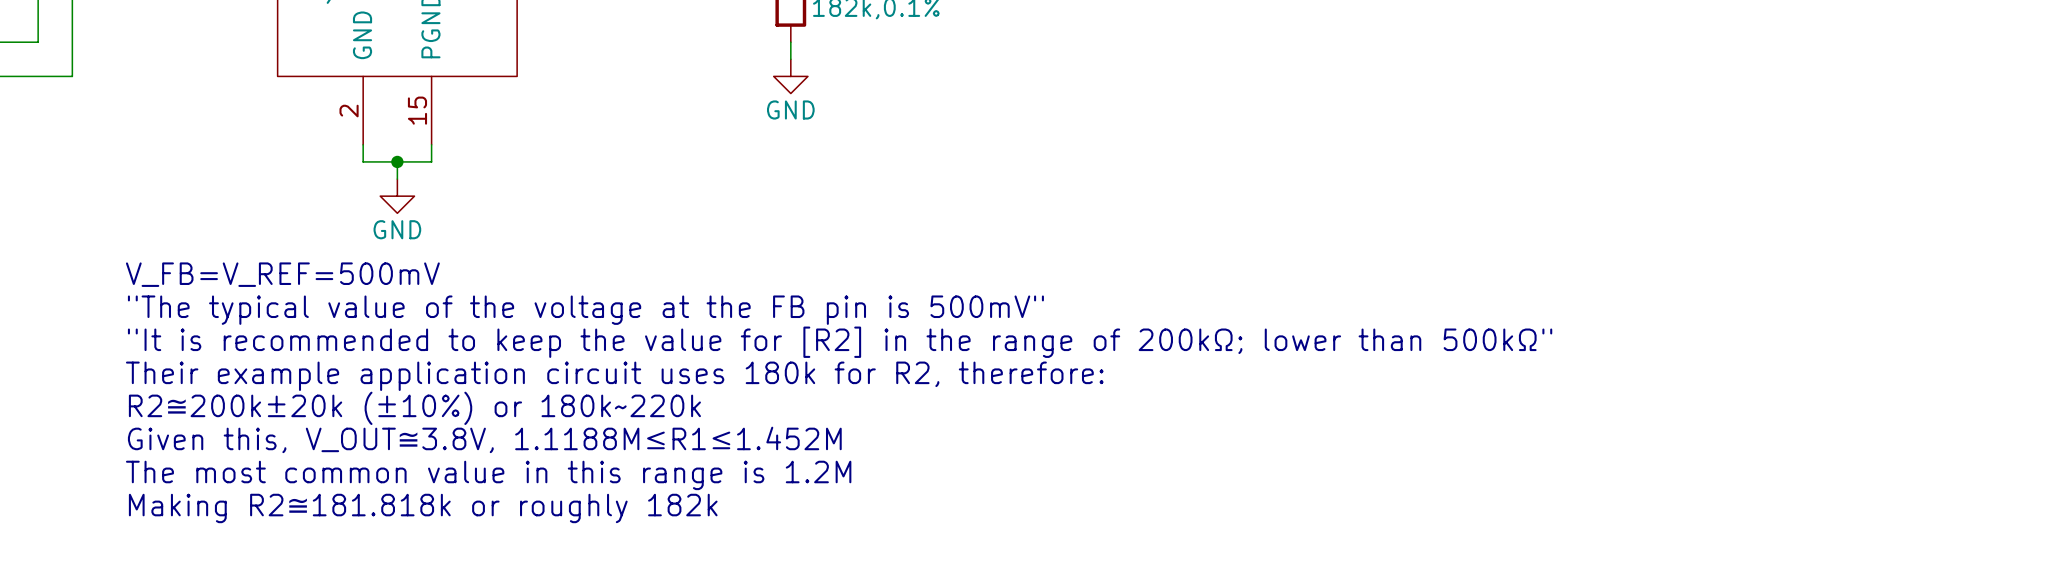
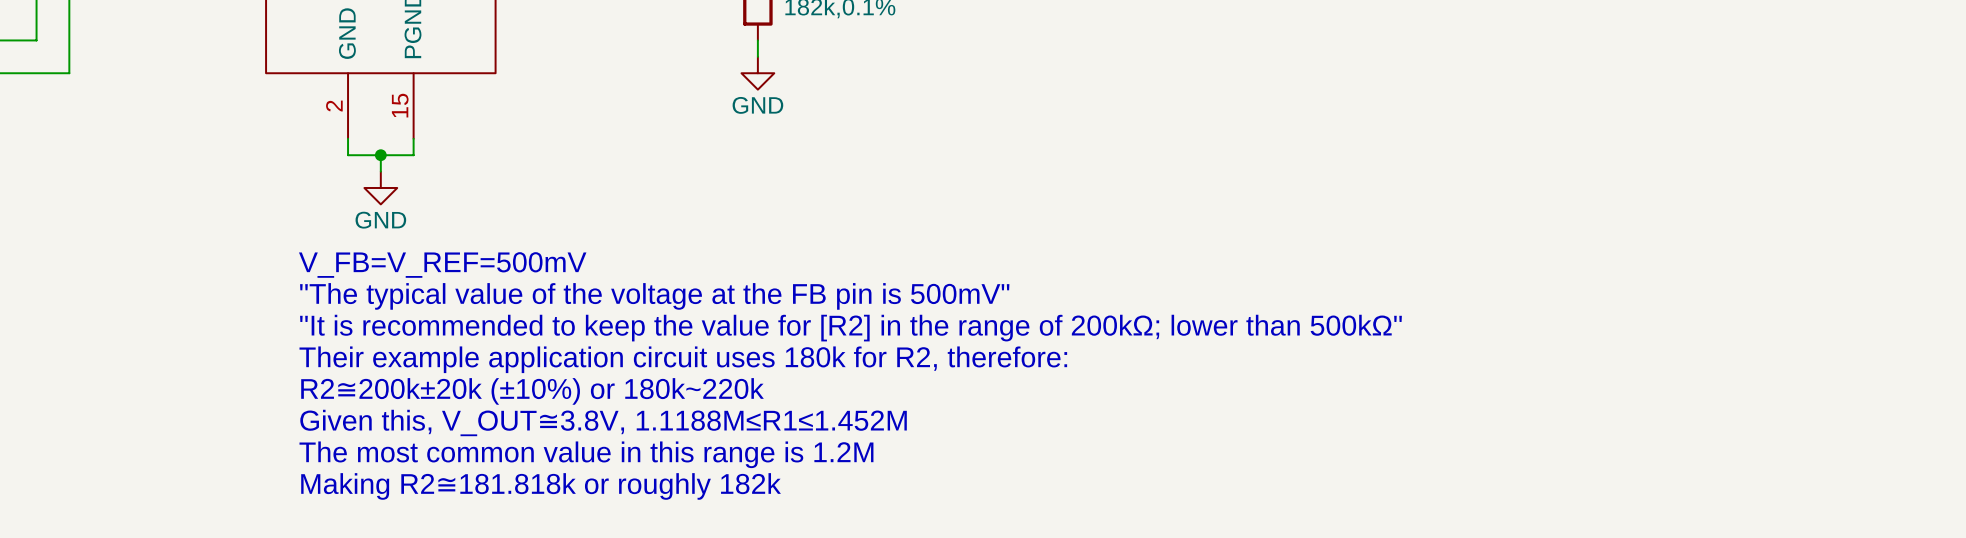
text position: V_FB=V_REF=500mV (282, 274) -> V_FB=V_REF=500mV (442, 264)
text position: "The typical value of the voltage at the FB pin is 500mV" (585, 310) -> "The typical value of the voltage at the FB pin is 500mV" (654, 296)
text position: "It is recommended to keep the value for [R2] in the range of 200kΩ; lower than 500kΩ" (840, 342) -> "It is recommended to keep the value for [R2] in the range of 200kΩ; lower than 500kΩ" (850, 328)
text position: Their example application circuit uses 180k for R2, therefore: (614, 376) -> Their example application circuit uses 180k for R2, therefore: (683, 359)
text position: R2≅200k±20k (±10%) or 180k~220k (414, 408) -> R2≅200k±20k (±10%) or 180k~220k (532, 391)
text position: Given this, V_OUT≅3.8V, 1.1188M≤R1≤1.452M (484, 439) -> Given this, V_OUT≅3.8V, 1.1188M≤R1≤1.452M (603, 422)
text position: The most common value in this range is 1.2M (488, 475) -> The most common value in this range is 1.2M (586, 454)
text position: Making R2≅181.818k or roughly 182k (423, 508) -> Making R2≅181.818k or roughly 182k (541, 486)

